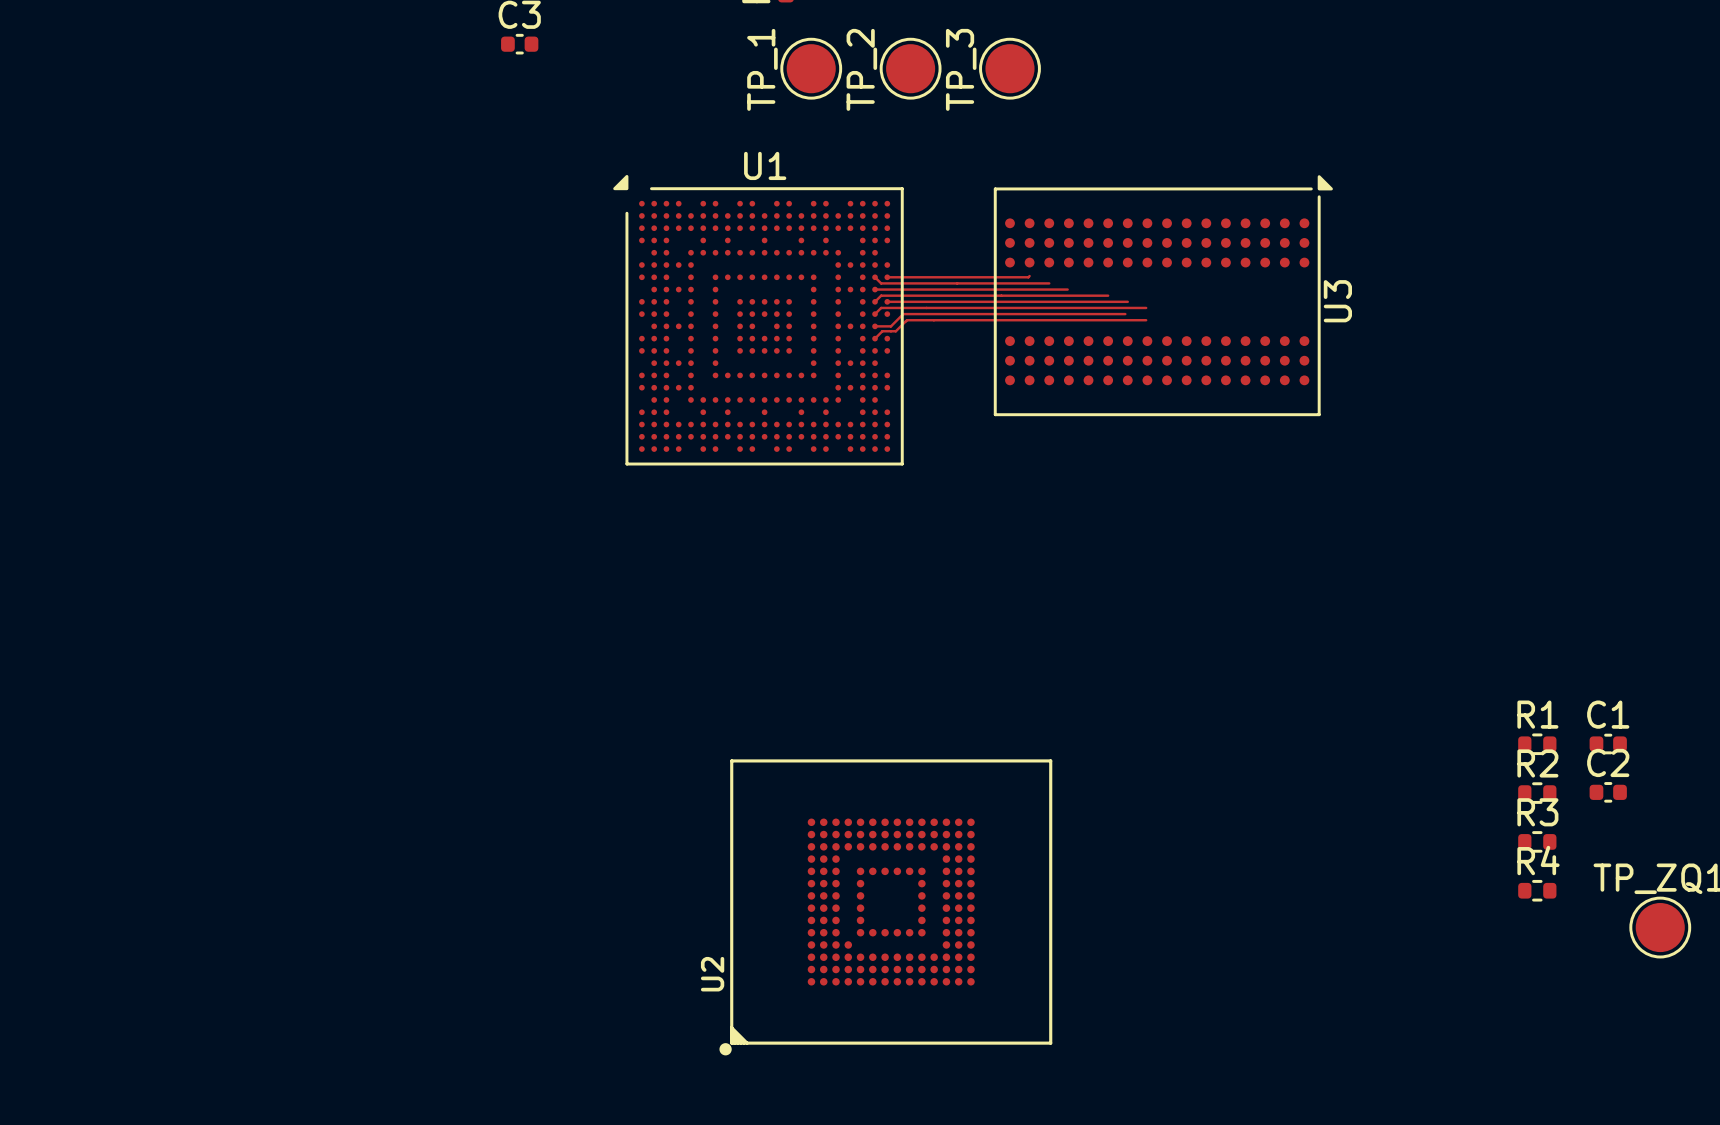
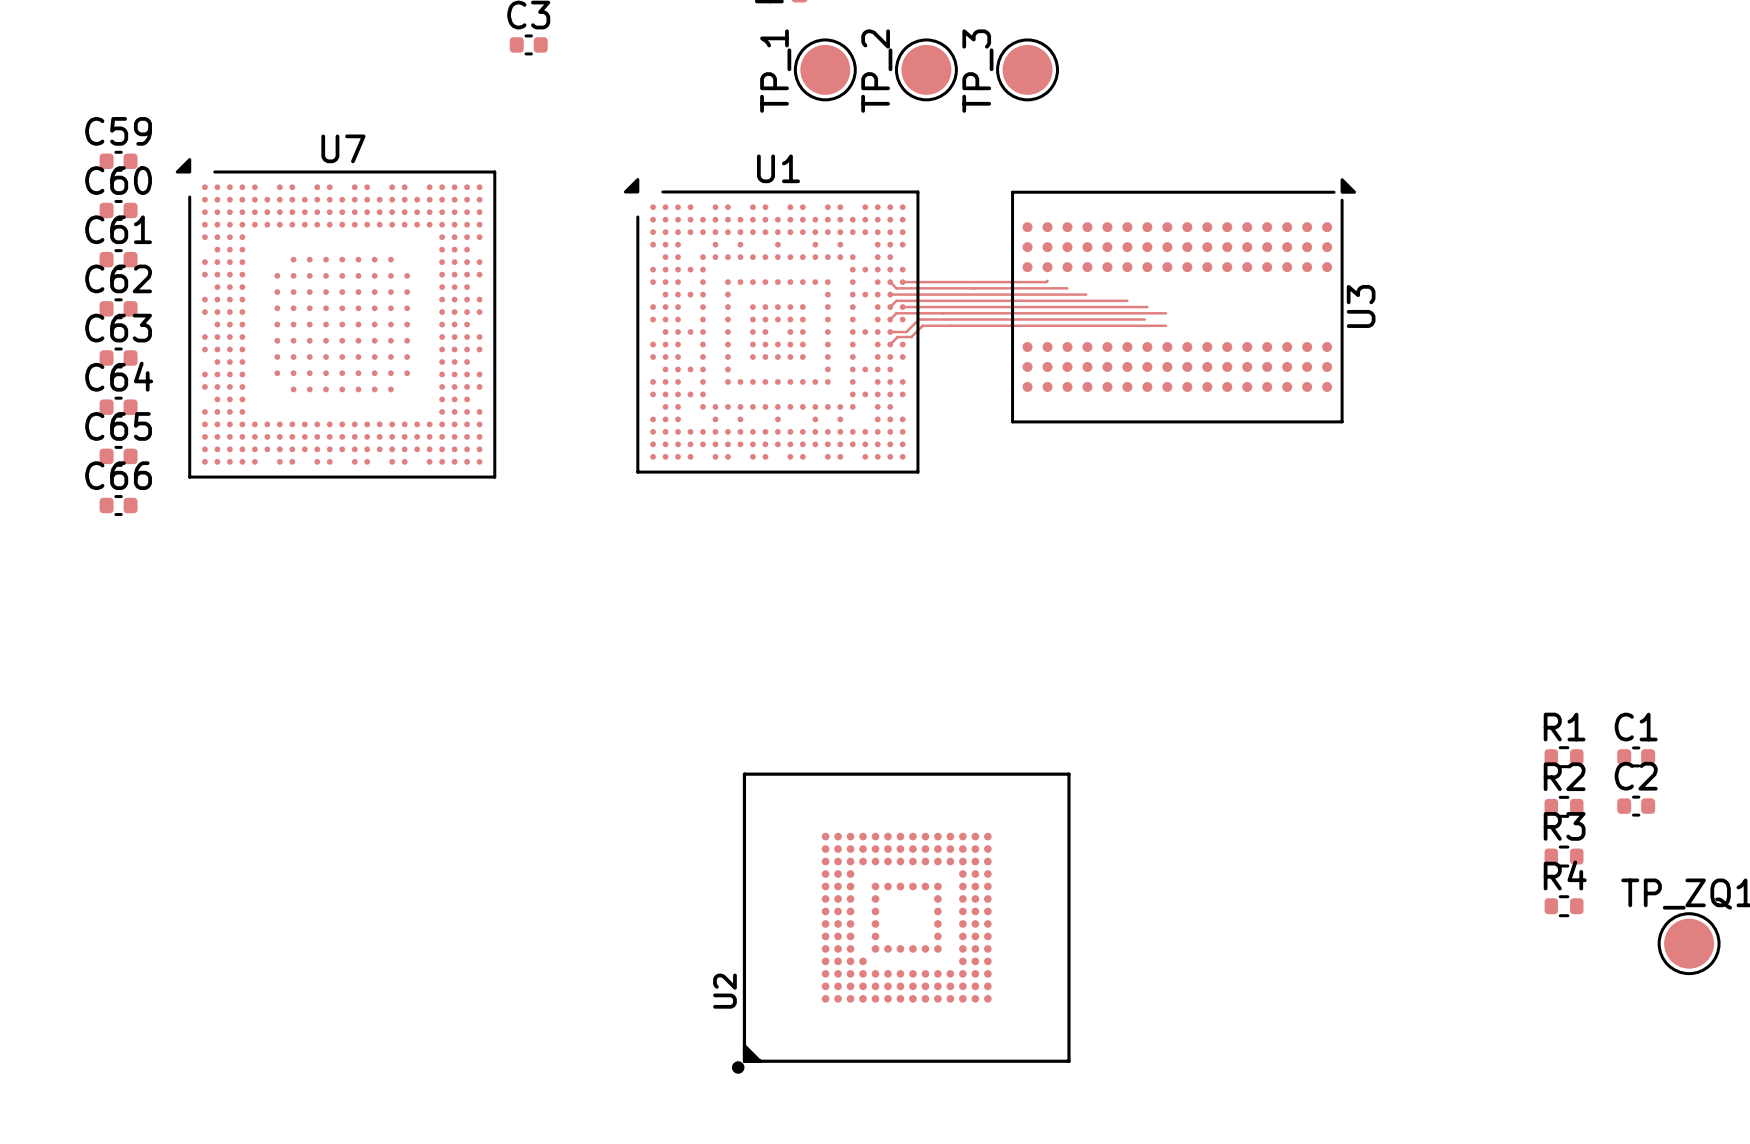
C59: none -> (118, 161)
C60: none -> (118, 210)
C61: none -> (118, 259)
C62: none -> (118, 308)
U7: none -> (336, 318)
C63: none -> (118, 357)
C64: none -> (118, 407)
C65: none -> (118, 456)
C66: none -> (118, 505)

